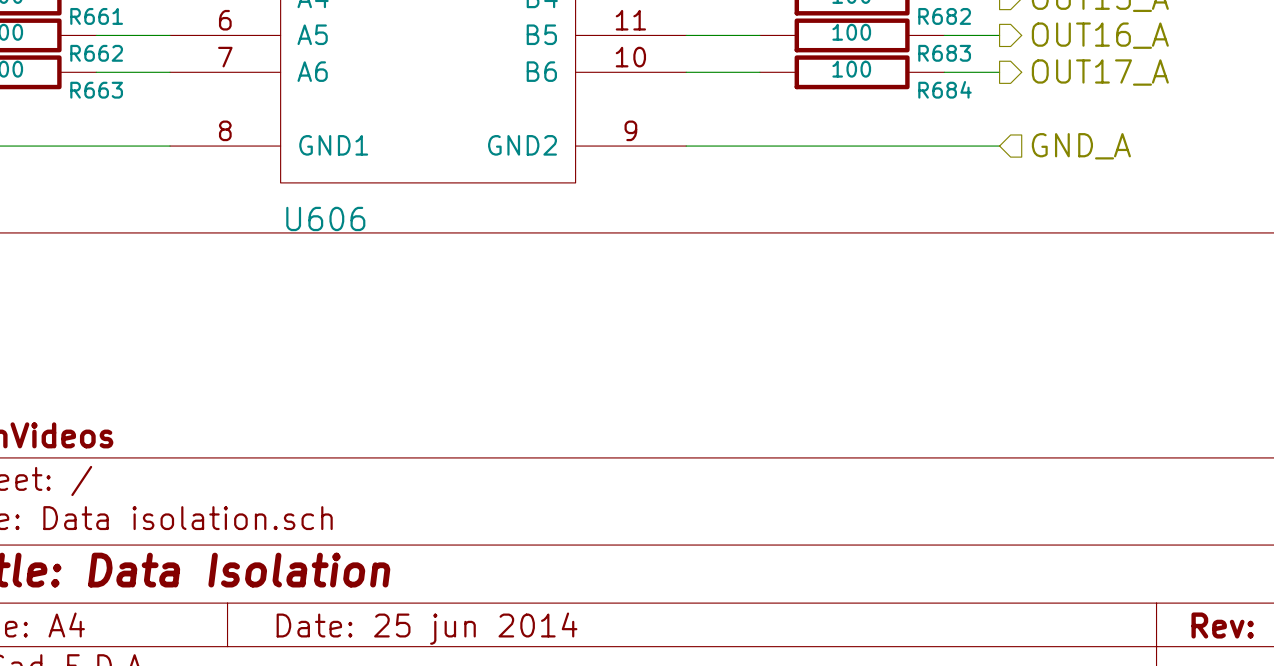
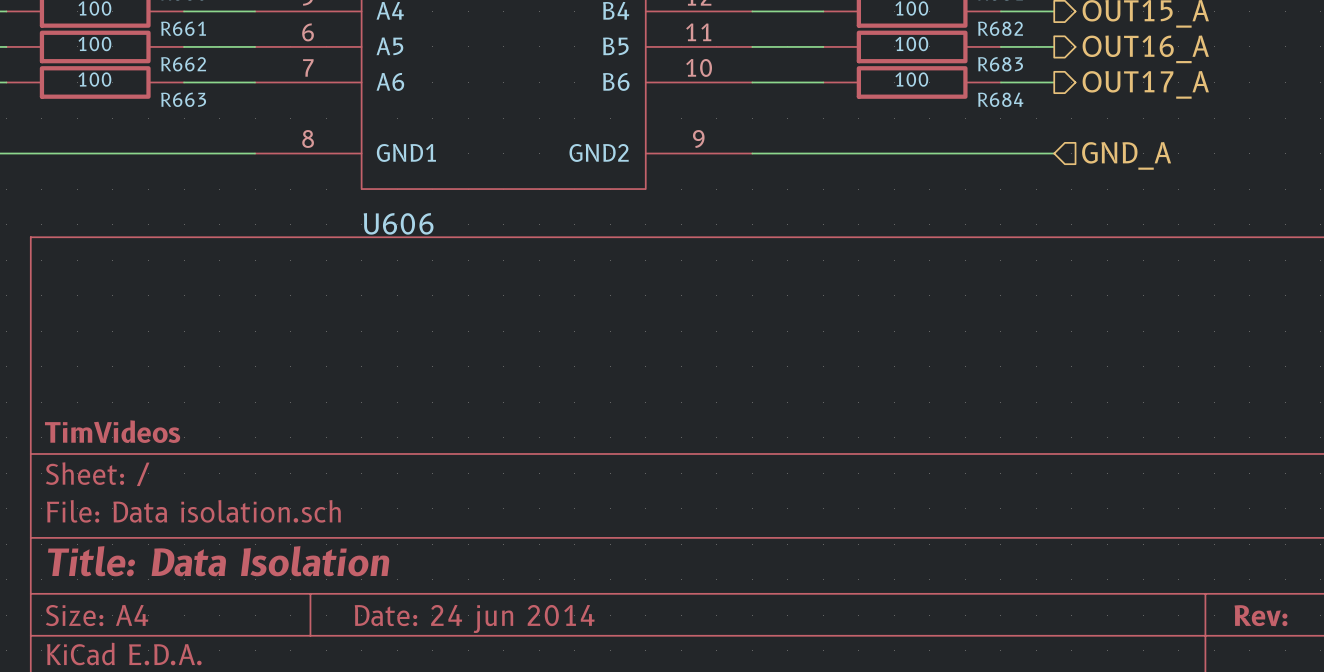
title block: Date: 25 jun 2014 (427, 628) -> Date: 24 jun 2014 (474, 618)

